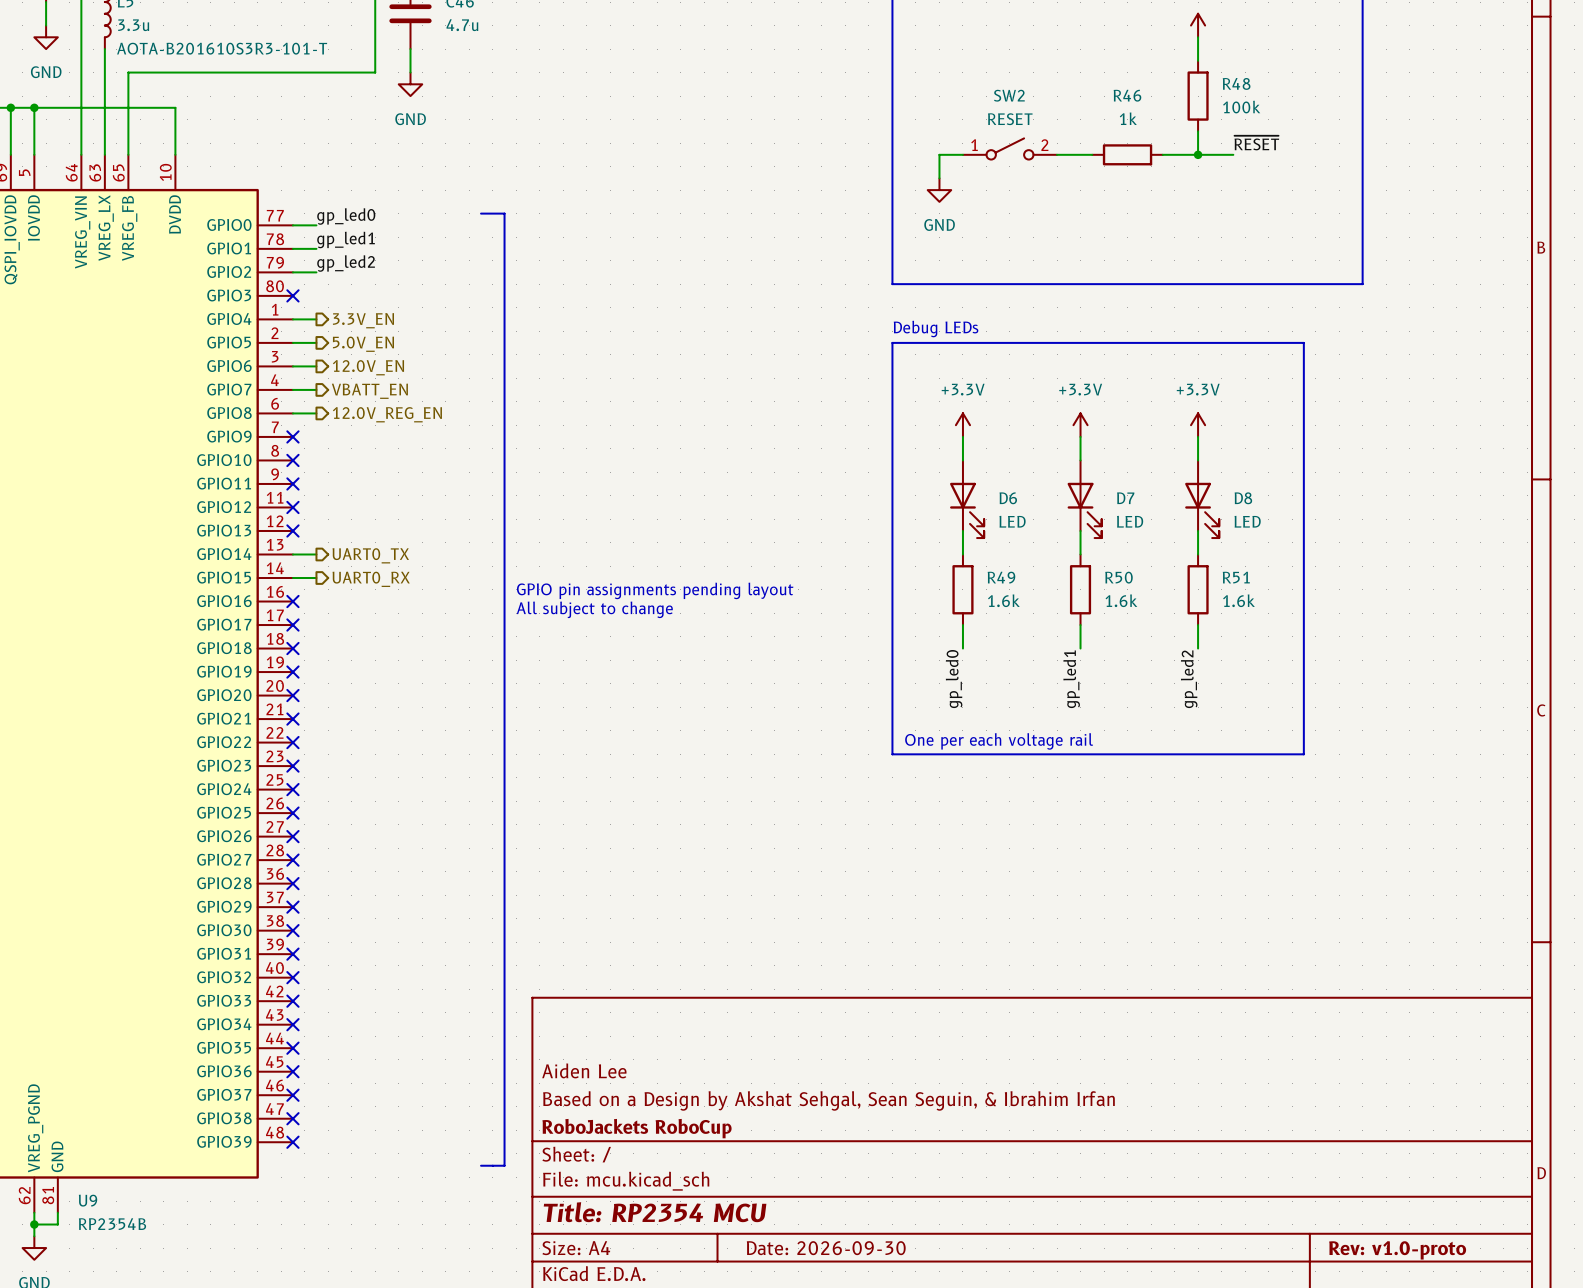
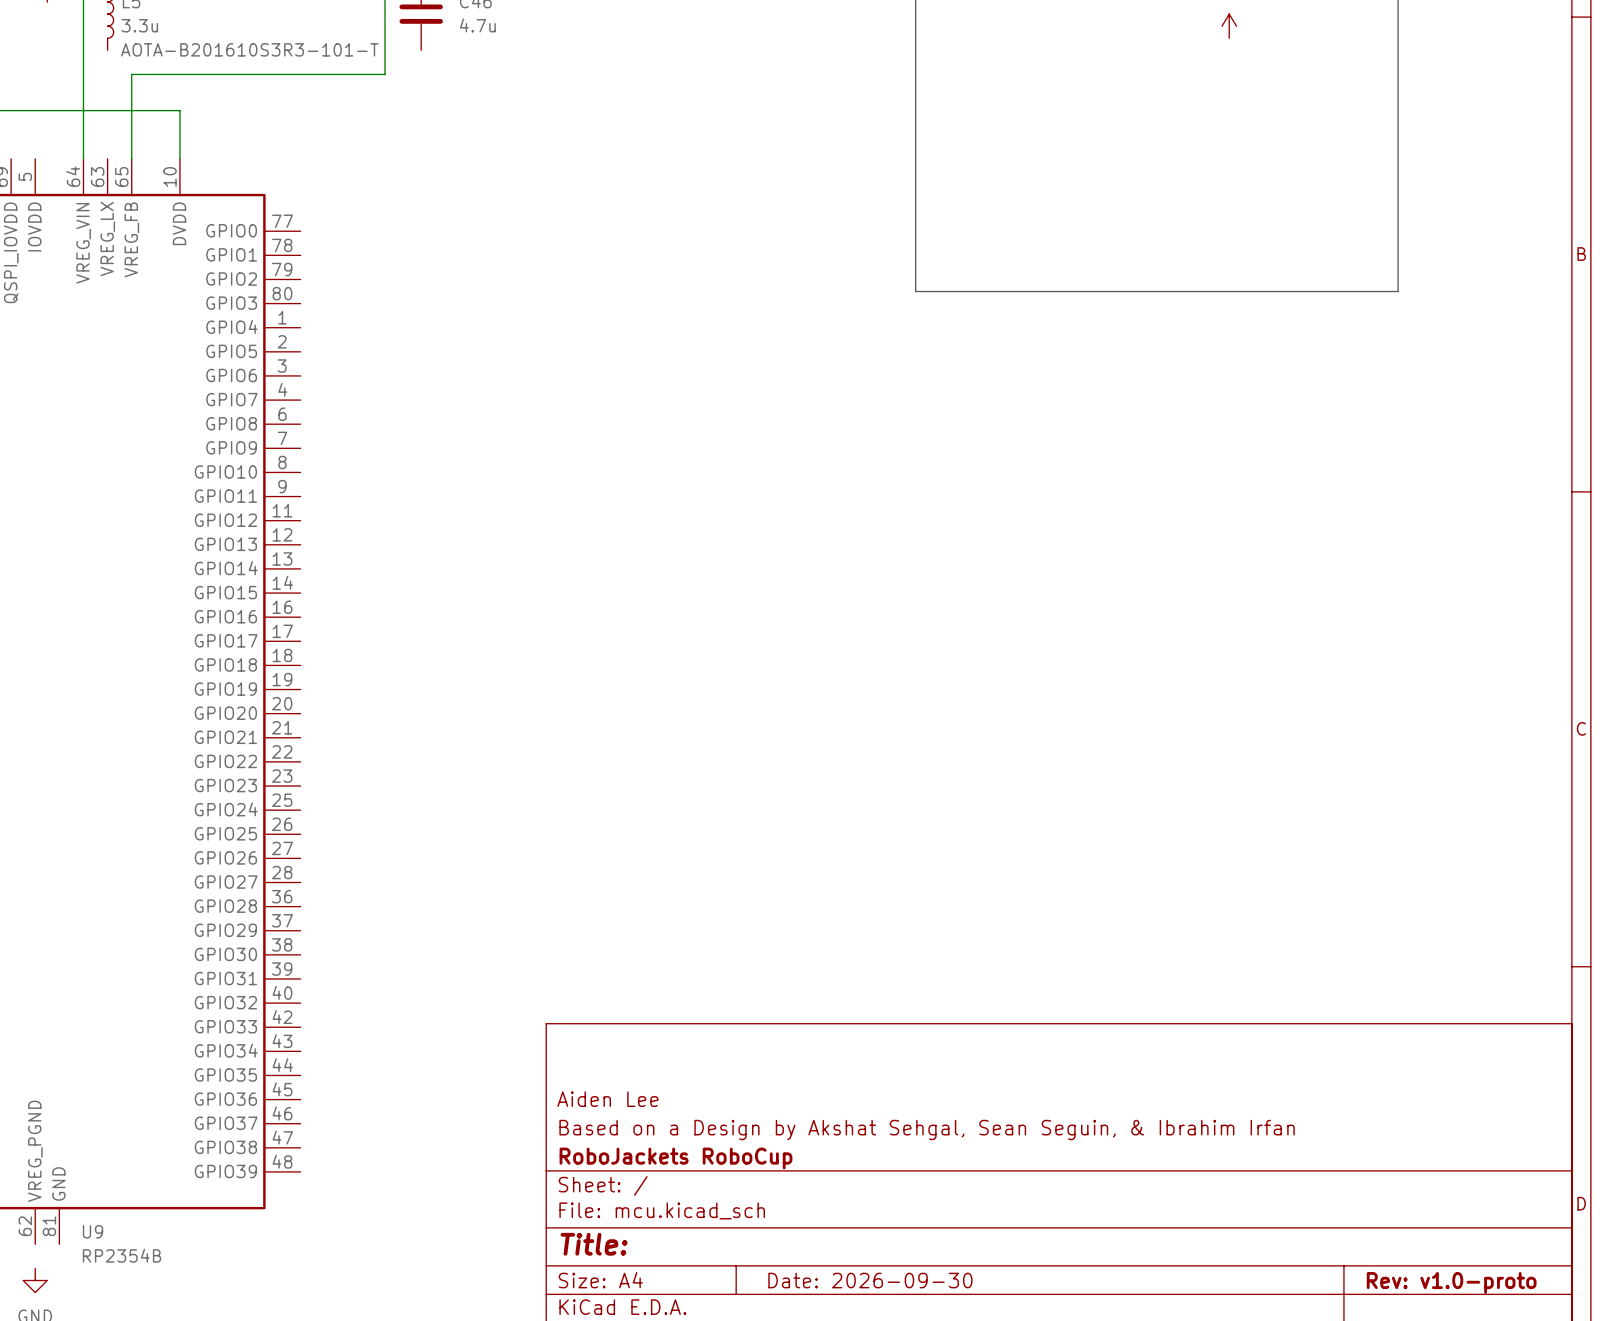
wire: (46, 2) (46, 25) -> none
power symbol: GND (46, 37) -> none
wire: (1198, 37) (1198, 60) -> none
wire: (104, 49) (104, 154) -> none
wire: (410, 49) (410, 72) -> none
power symbol: GND (410, 84) -> none
R48: 100k (1198, 96) -> none
wire: (10, 107) (10, 154) -> none
junction: (10, 107) -> none
wire: (34, 107) (34, 154) -> none
junction: (34, 107) -> none
wire: (1198, 131) (1198, 154) -> none
label: ~{RESET} (1256, 143) -> none
SW2: RESET (1009, 148) -> none
wire: (962, 154) (939, 154) (939, 178) -> none
wire: (1057, 154) (1092, 154) -> none
R46: 1k (1127, 154) -> none
wire: (1162, 154) (1233, 154) -> none
junction: (1198, 154) -> none
power symbol: GND (939, 190) -> none
line: (481, 213) (504, 213) (504, 1165) (481, 1165) -> none
label: gp_led0 (346, 216) -> none
wire: (292, 225) (316, 225) -> none
label: gp_led1 (346, 239) -> none
wire: (292, 248) (316, 248) -> none
label: gp_led2 (346, 263) -> none
wire: (292, 272) (316, 272) -> none
no-connect mark: (292, 295) -> none
wire: (292, 319) (316, 319) -> none
hierarchical label: 3.3V_EN (363, 320) -> none
text: Debug LEDs (936, 329) -> none
wire: (292, 342) (316, 342) -> none
line: (892, 342) (892, 754) (1303, 754) (1303, 342) (892, 342) -> none
hierarchical label: 5.0V_EN (363, 344) -> none
wire: (292, 366) (316, 366) -> none
hierarchical label: 12.0V_EN (368, 367) -> none
wire: (292, 389) (316, 389) -> none
hierarchical label: VBATT_EN (369, 391) -> none
wire: (292, 413) (316, 413) -> none
hierarchical label: 12.0V_REG_EN (387, 414) -> none
power symbol: +3.3V (962, 425) -> none
power symbol: +3.3V (1080, 425) -> none
power symbol: +3.3V (1198, 425) -> none
no-connect mark: (292, 436) -> none
wire: (962, 436) (962, 460) -> none
wire: (1080, 436) (1080, 460) -> none
wire: (1198, 436) (1198, 460) -> none
no-connect mark: (292, 460) -> none
no-connect mark: (292, 483) -> none
D6: LED (967, 499) -> none
D7: LED (1084, 499) -> none
D8: LED (1202, 499) -> none
no-connect mark: (292, 507) -> none
no-connect mark: (292, 530) -> none
wire: (962, 530) (962, 554) -> none
wire: (1080, 530) (1080, 554) -> none
wire: (1198, 530) (1198, 554) -> none
wire: (292, 554) (316, 554) -> none
hierarchical label: UART0_TX (370, 555) -> none
wire: (292, 578) (316, 578) -> none
hierarchical label: UART0_RX (371, 579) -> none
R49: 1.6k (962, 589) -> none
R50: 1.6k (1080, 589) -> none
R51: 1.6k (1198, 589) -> none
text: GPIO pin assignments pending layout (655, 590) -> none
no-connect mark: (292, 601) -> none
text: All subject to change (594, 609) -> none
no-connect mark: (292, 625) -> none
wire: (962, 625) (962, 648) -> none
wire: (1080, 625) (1080, 648) -> none
wire: (1198, 625) (1198, 648) -> none
no-connect mark: (292, 648) -> none
no-connect mark: (292, 672) -> none
label: gp_led0 (954, 679) -> none
label: gp_led1 (1071, 679) -> none
label: gp_led2 (1189, 679) -> none
no-connect mark: (292, 695) -> none
no-connect mark: (292, 719) -> none
text: One per each voltage rail (999, 741) -> none
no-connect mark: (292, 742) -> none
no-connect mark: (292, 766) -> none
no-connect mark: (292, 789) -> none
no-connect mark: (292, 813) -> none
no-connect mark: (292, 836) -> none
no-connect mark: (292, 860) -> none
no-connect mark: (292, 883) -> none
no-connect mark: (292, 907) -> none
no-connect mark: (292, 930) -> none
no-connect mark: (292, 954) -> none
no-connect mark: (292, 977) -> none
no-connect mark: (292, 1001) -> none
no-connect mark: (292, 1024) -> none
no-connect mark: (292, 1048) -> none
no-connect mark: (292, 1071) -> none
no-connect mark: (292, 1095) -> none
no-connect mark: (292, 1118) -> none
no-connect mark: (292, 1142) -> none
wire: (34, 1212) (34, 1236) -> none
wire: (57, 1212) (57, 1224) (34, 1224) -> none
title block: Title: RP2354 MCU (655, 1212) -> Title: (594, 1244)
junction: (34, 1224) -> none

